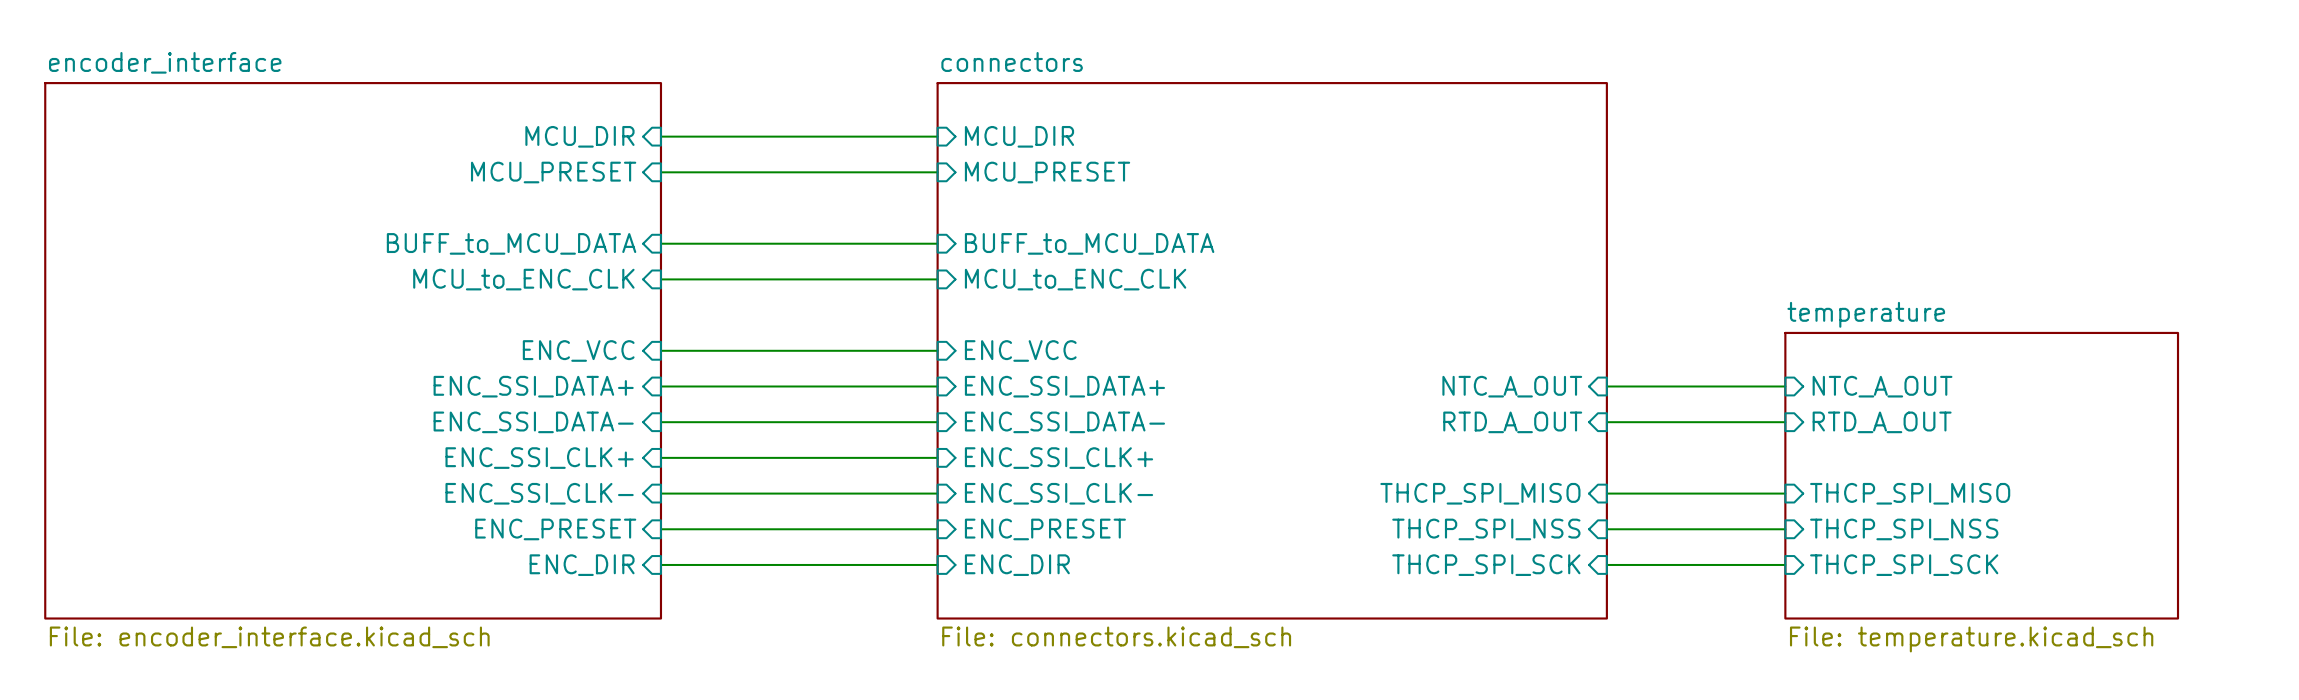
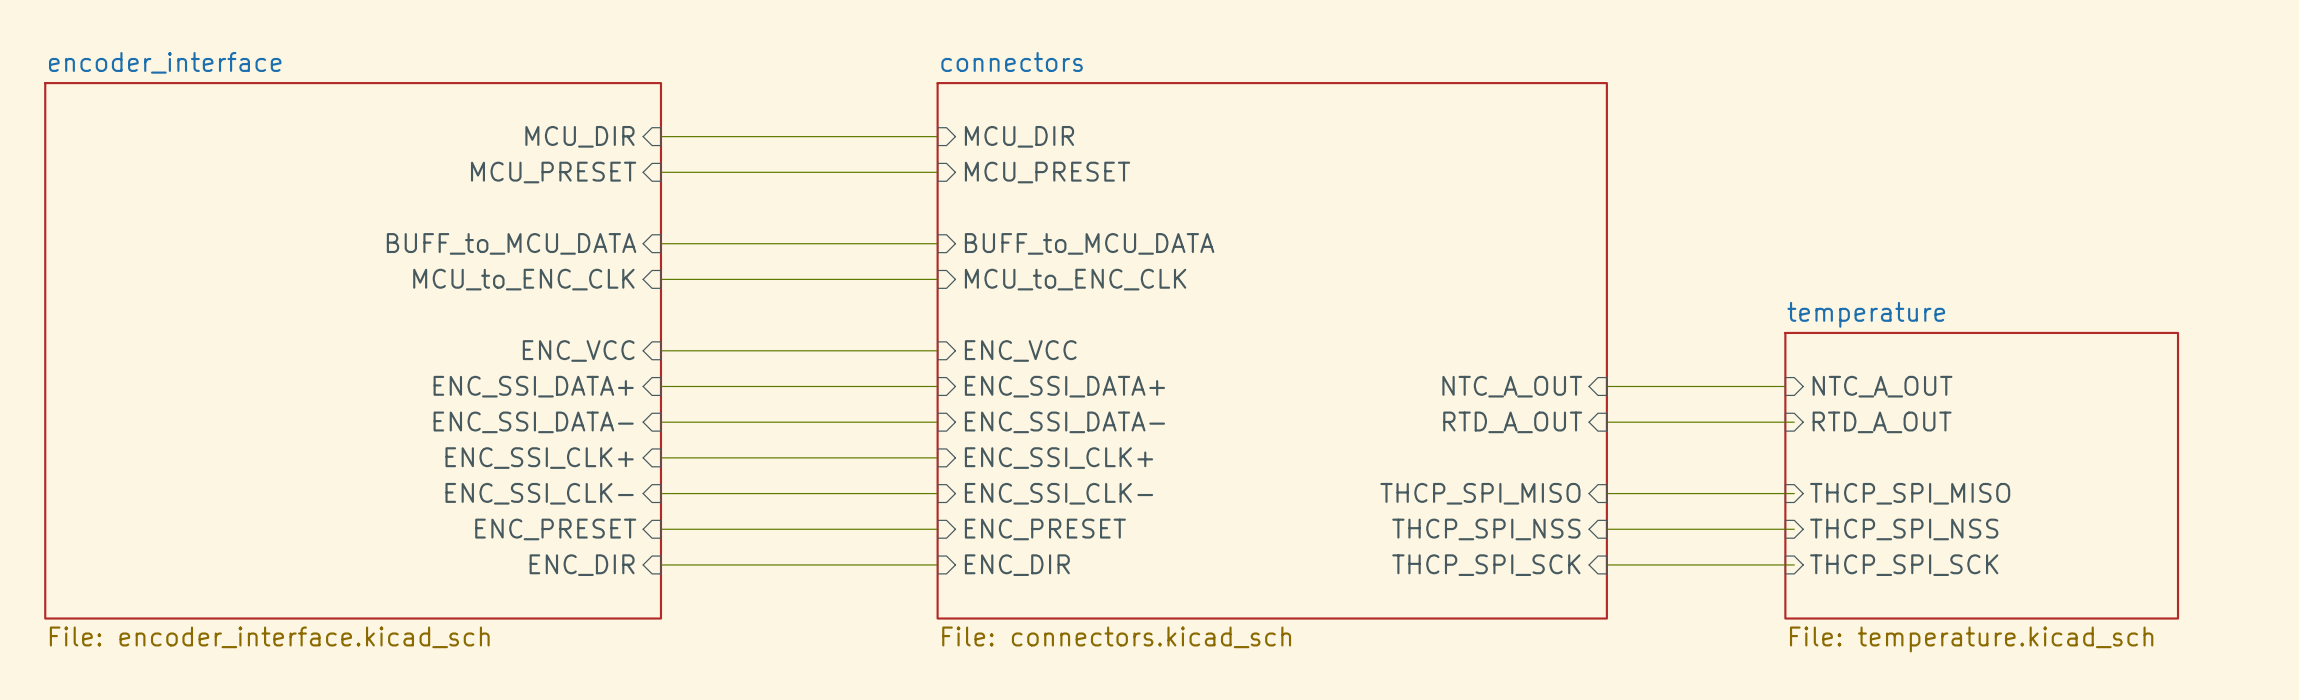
wire: none -> (1785, 422) (1794, 422)
wire: none -> (1785, 493) (1794, 493)
wire: none -> (1785, 529) (1794, 529)
wire: none -> (1785, 564) (1794, 564)

